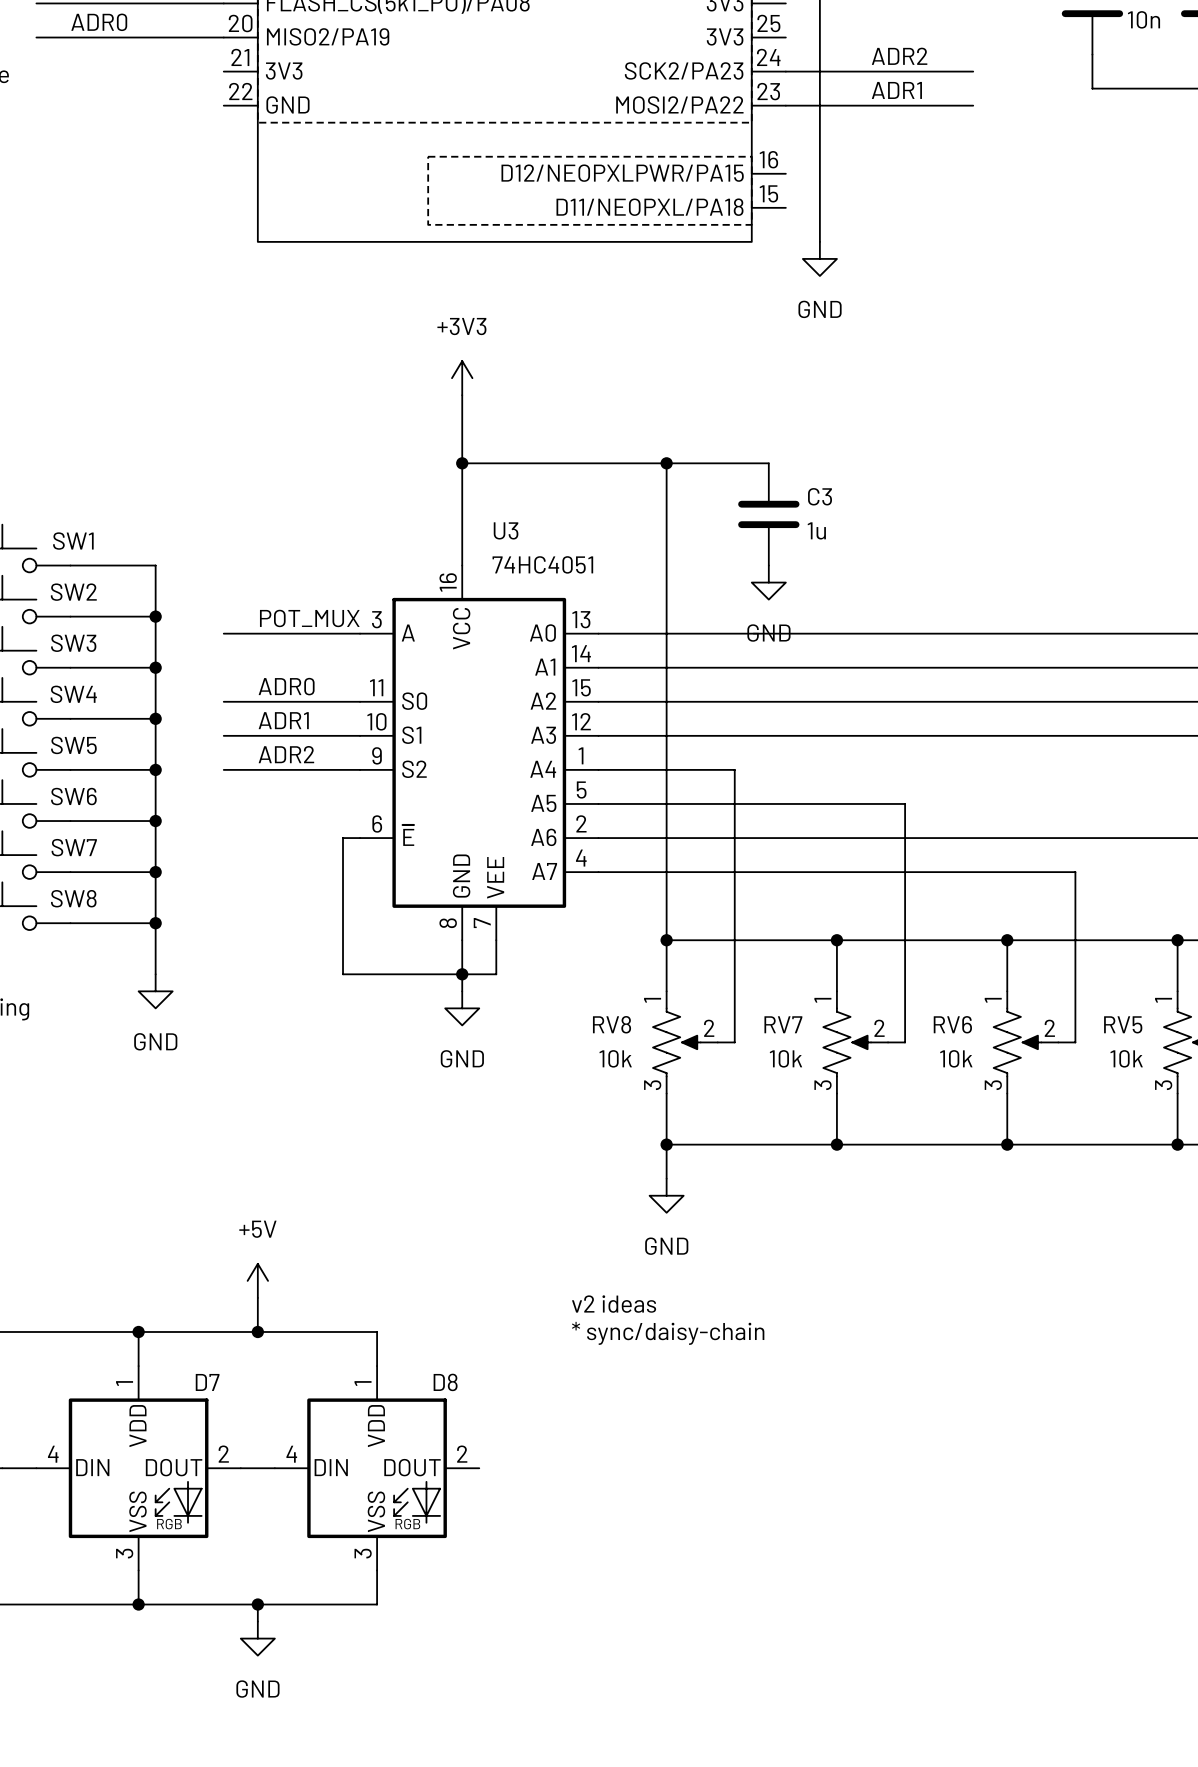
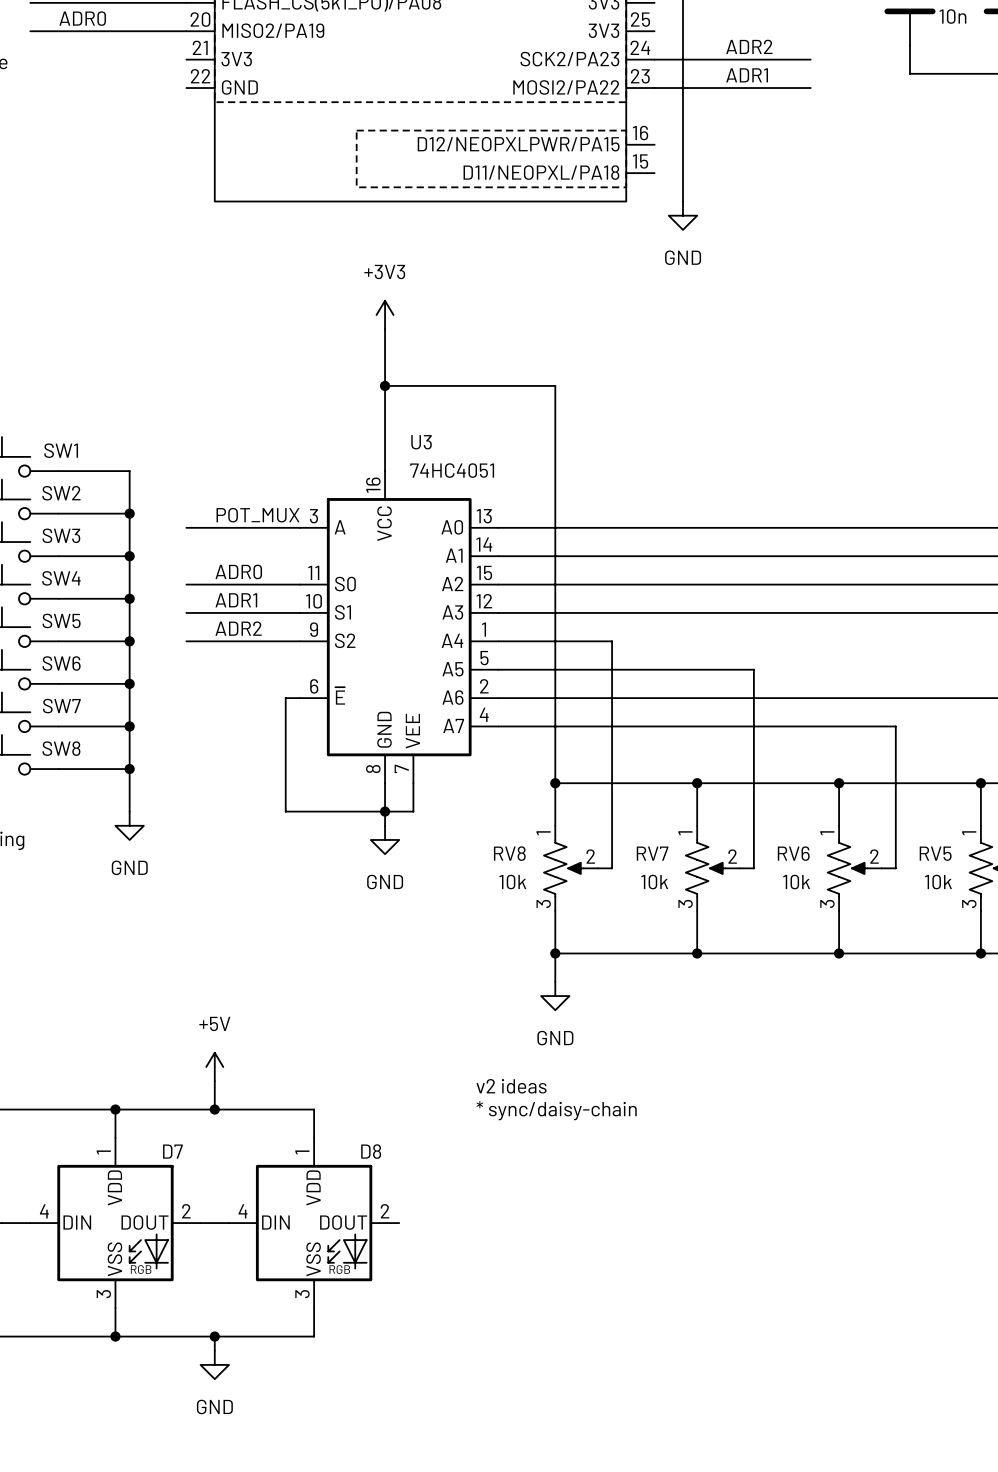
wire: (666, 463) (768, 463) -> none
junction: (666, 463) -> none
C3: 1u (768, 514) -> none
power symbol: GND (768, 582) -> none

